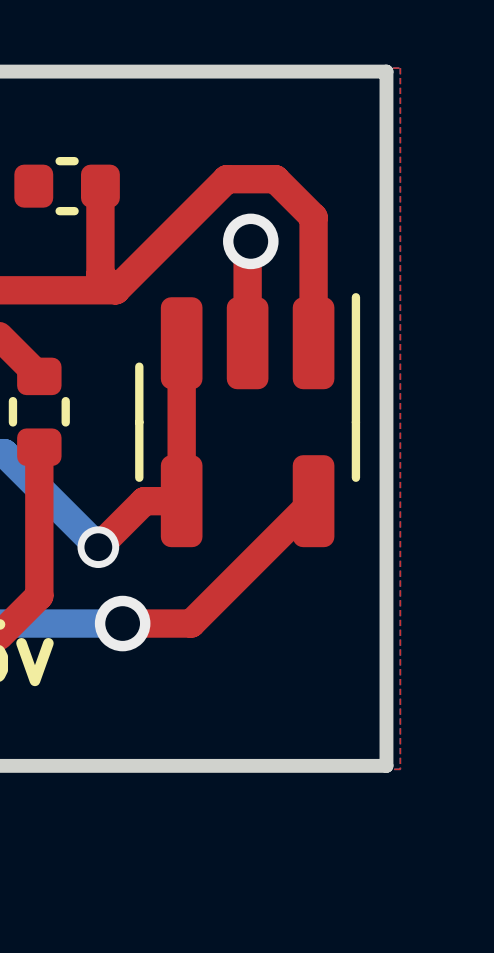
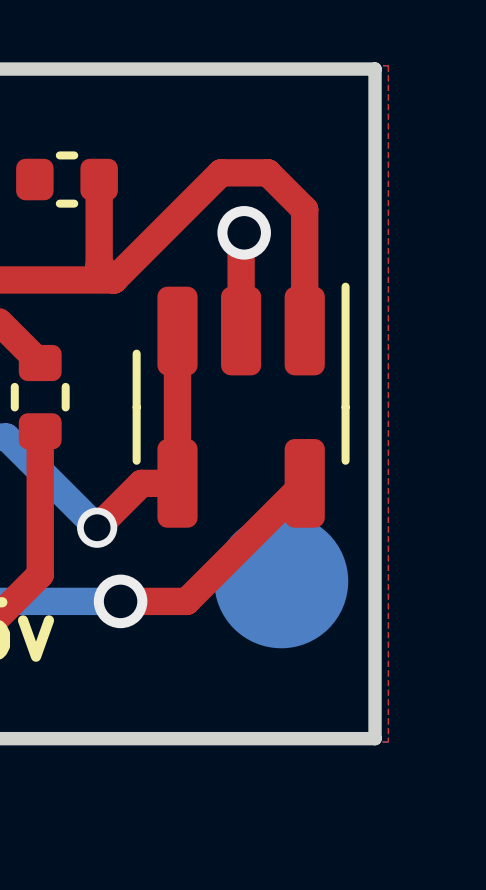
part: none -> (281, 581)

